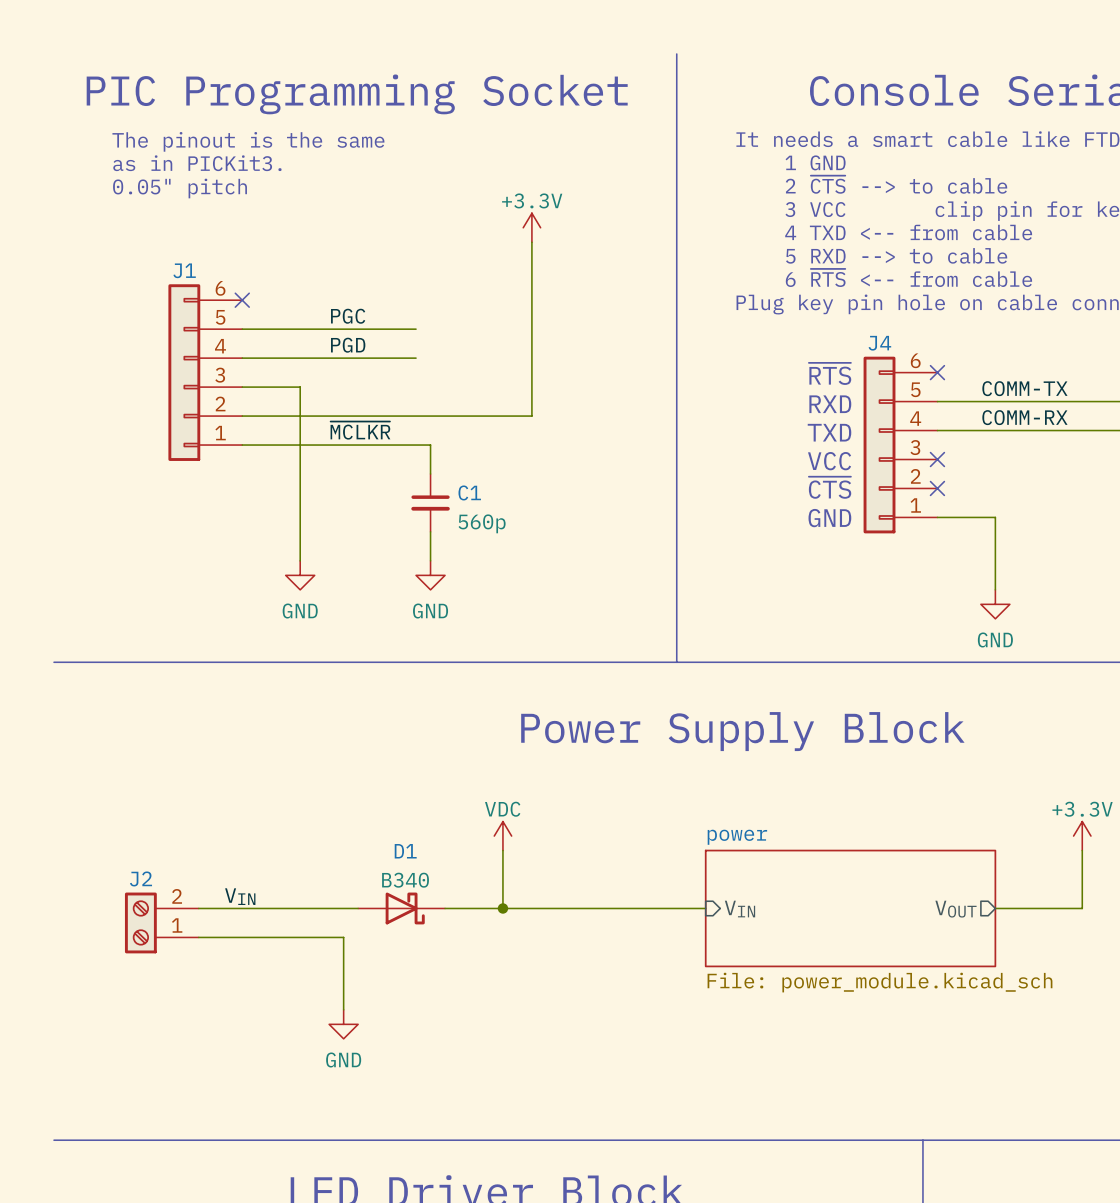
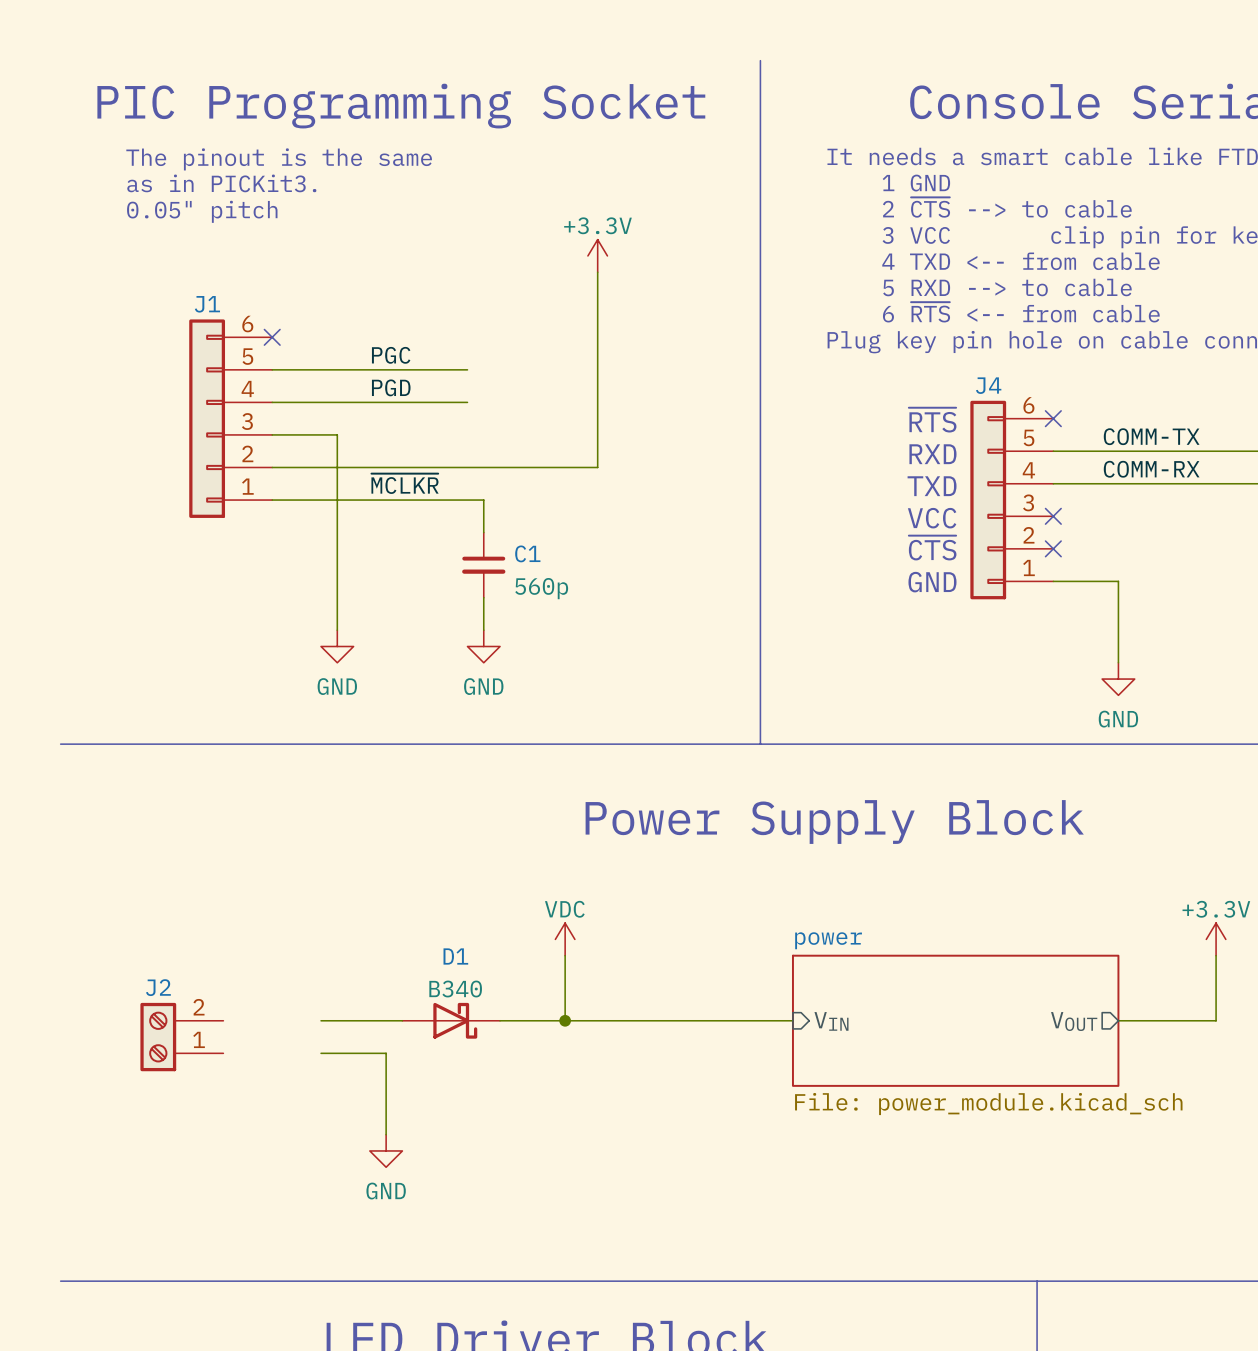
label: VIN (240, 896) -> none
wire: (198, 908) (285, 908) -> none
wire: (198, 937) (285, 937) -> none

